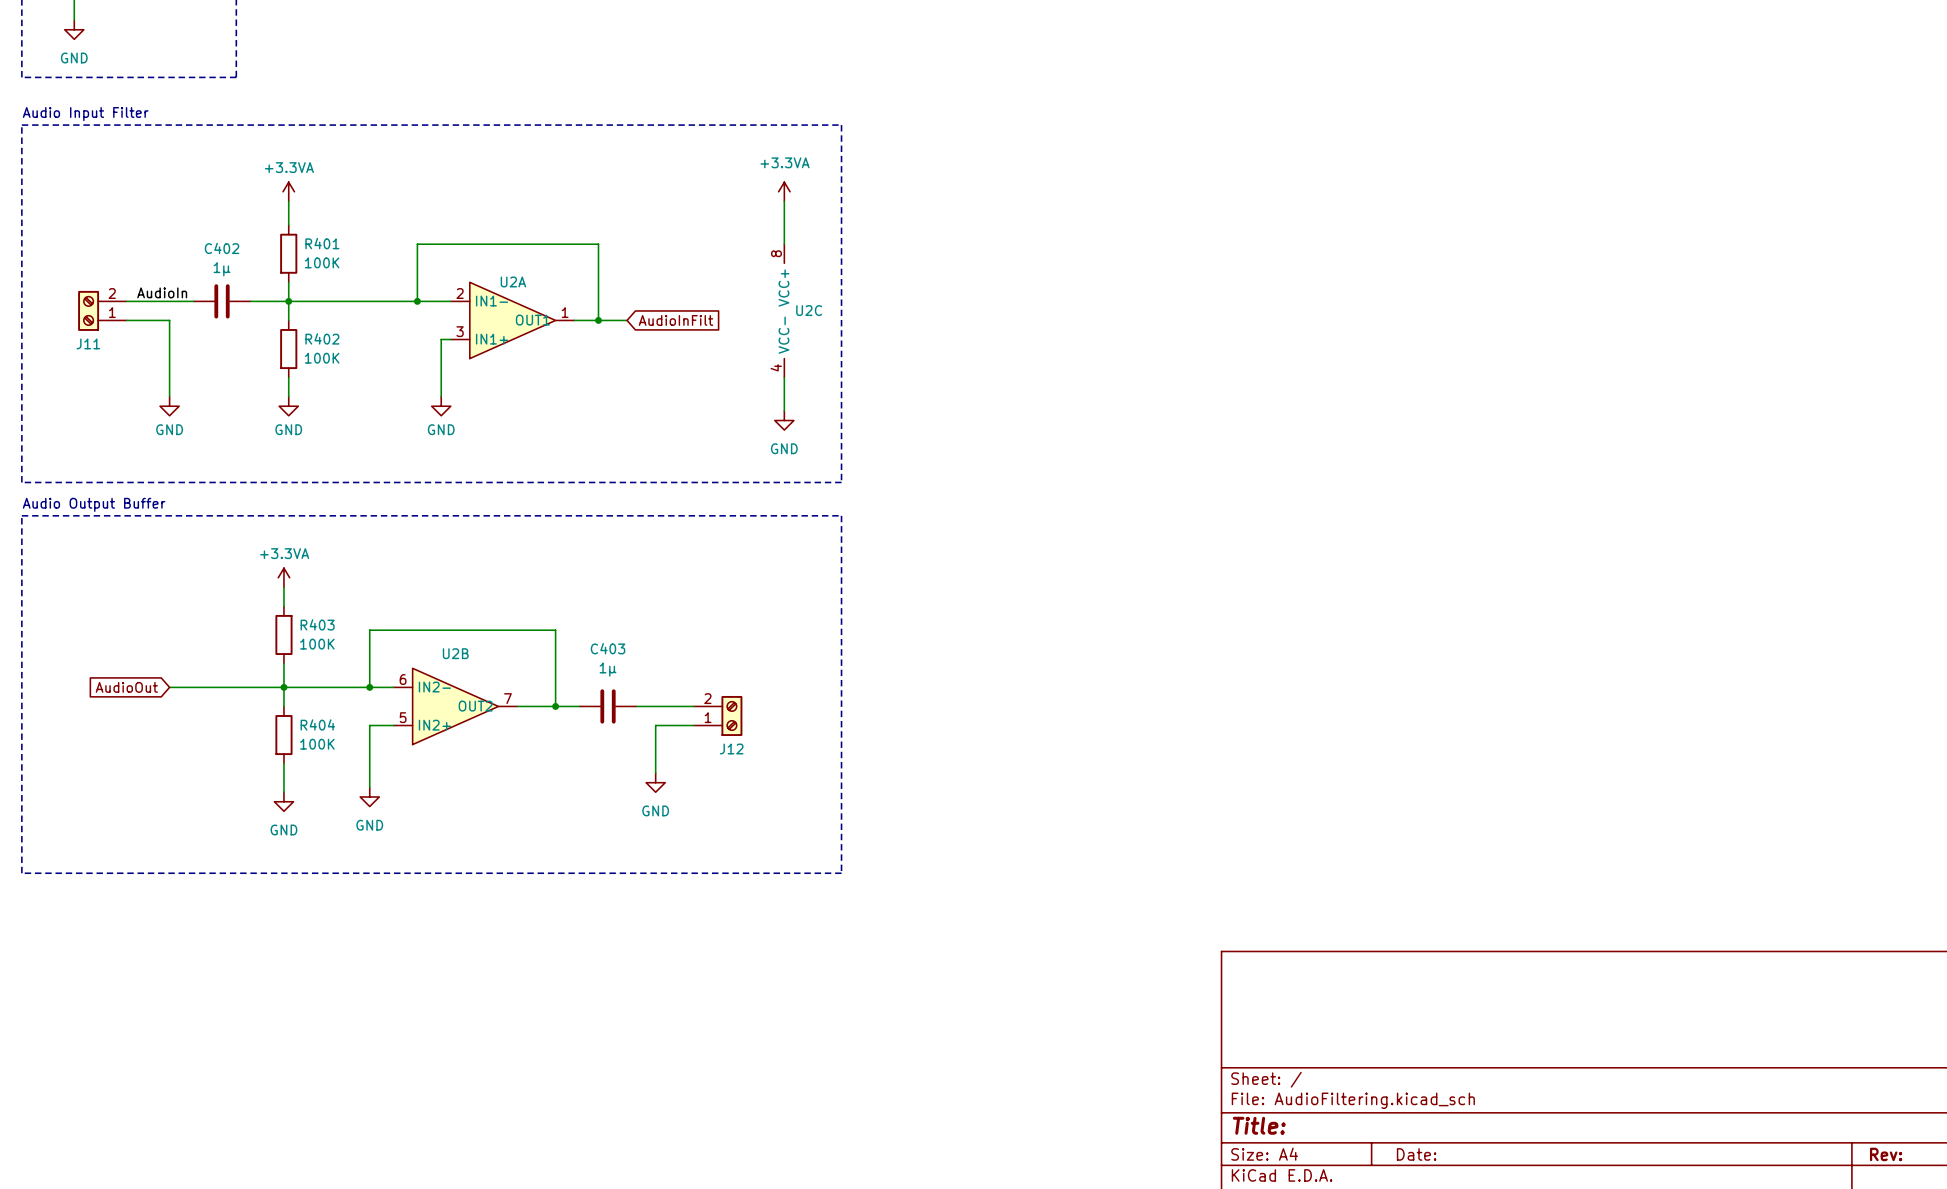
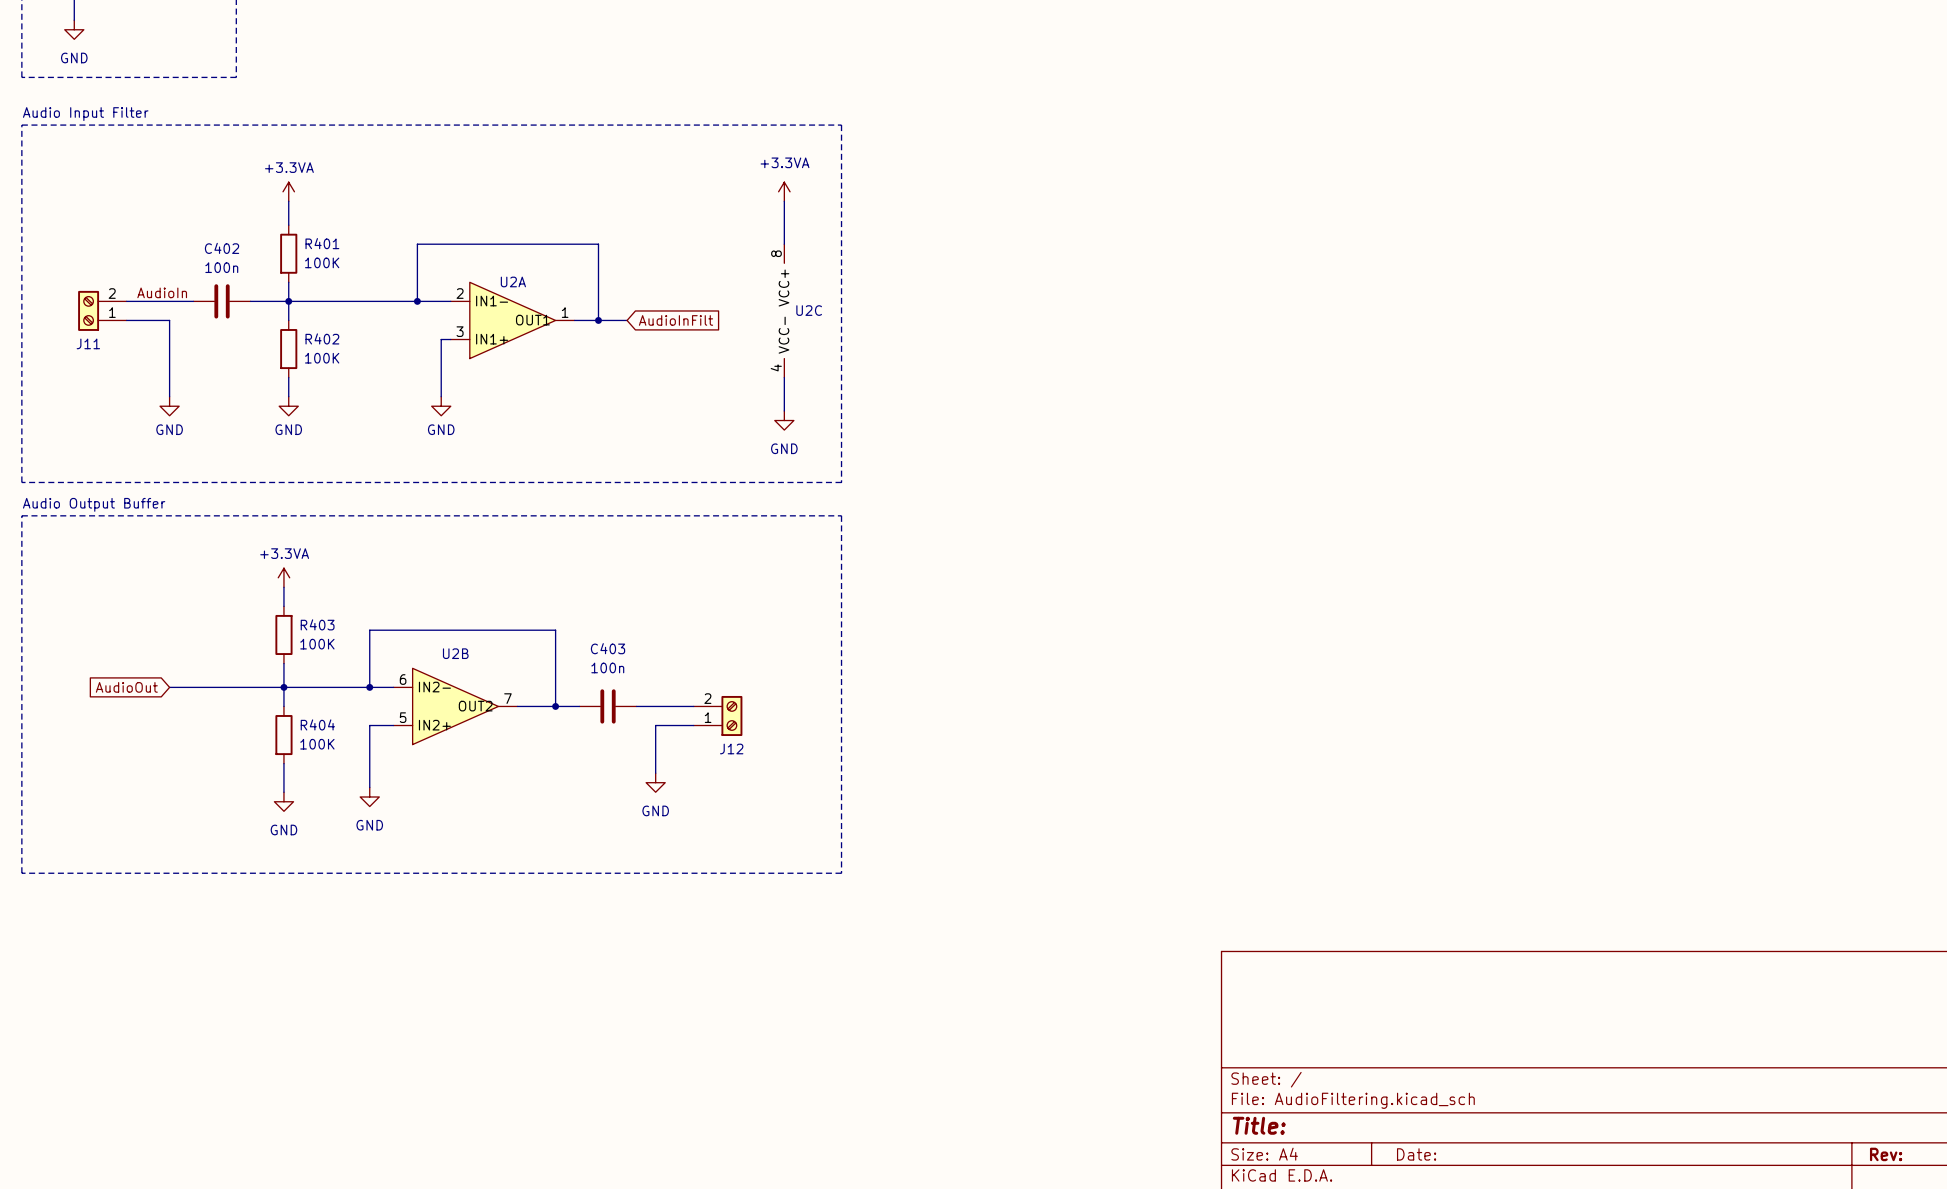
C402 value: 1µ (222, 269) -> 100n (221, 267)
C403 value: 1µ (608, 669) -> 100n (607, 667)

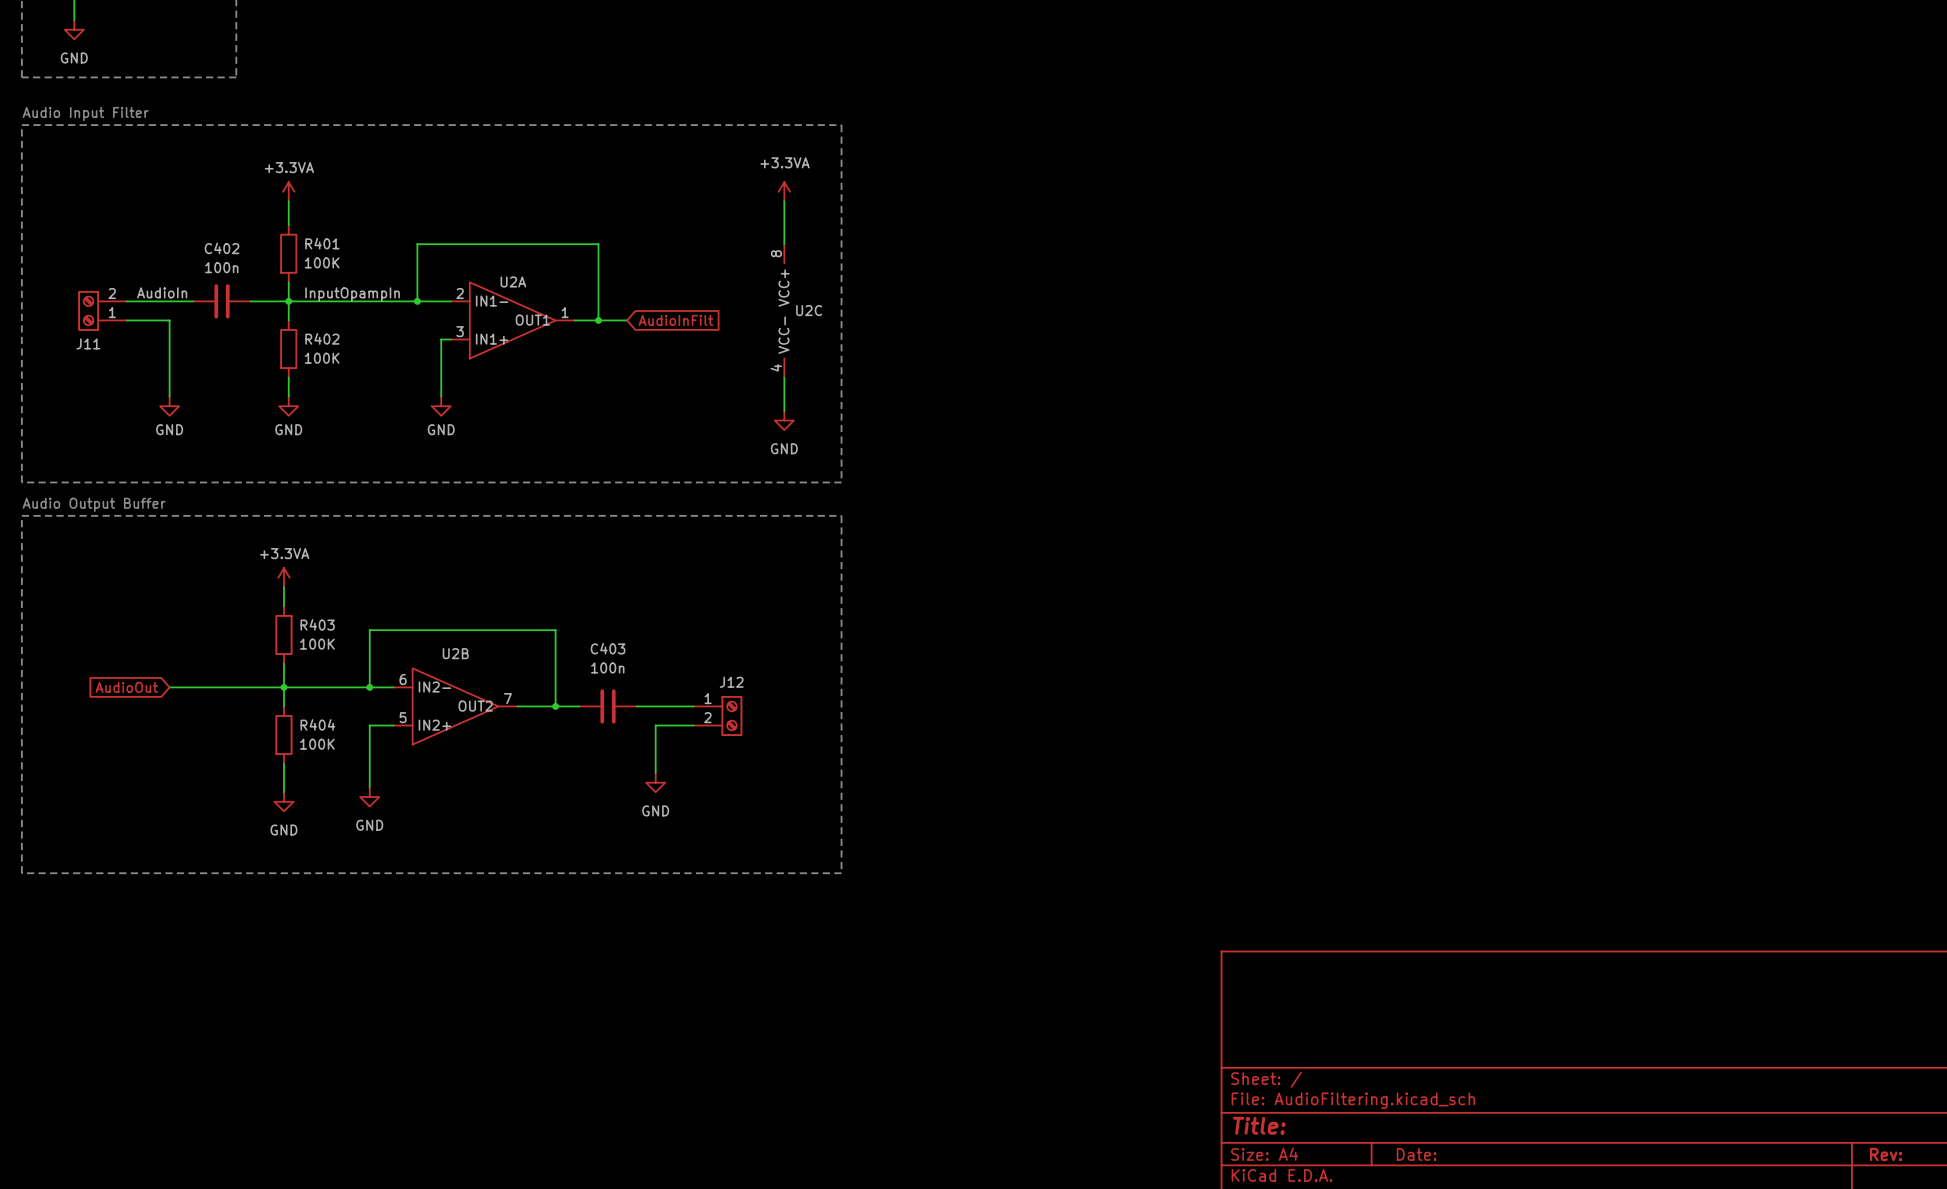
label: none -> InputOpampIn (352, 294)
J12 flip: as is (731, 715) -> up-down (731, 715)

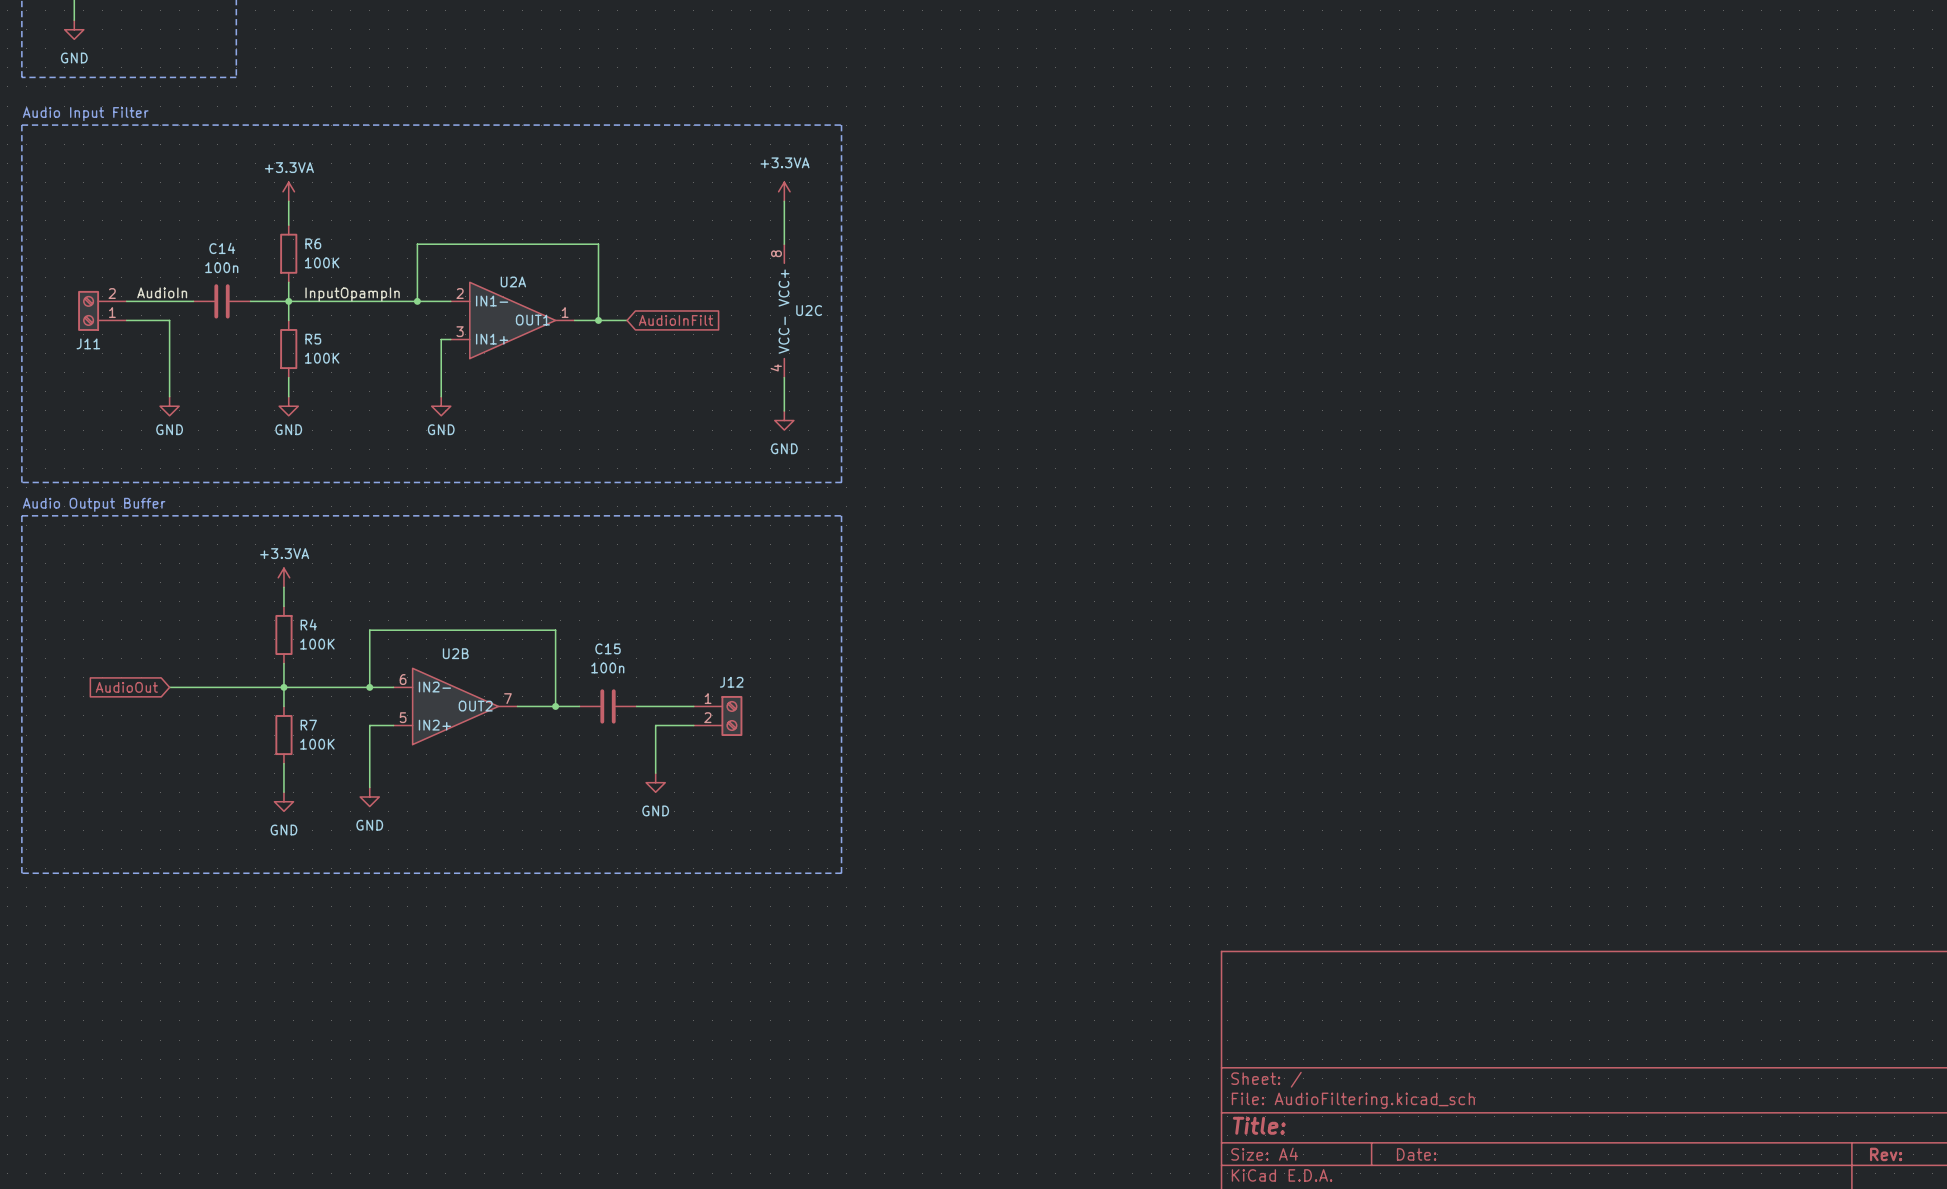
R401 name: R401 (322, 243) -> R6 (313, 243)
C402 name: C402 (222, 248) -> C14 (222, 248)
R402 name: R402 (322, 338) -> R5 (313, 339)
R403 name: R403 (317, 624) -> R4 (308, 624)
C403 name: C403 (608, 648) -> C15 (608, 648)
R404 name: R404 (317, 724) -> R7 (308, 725)

